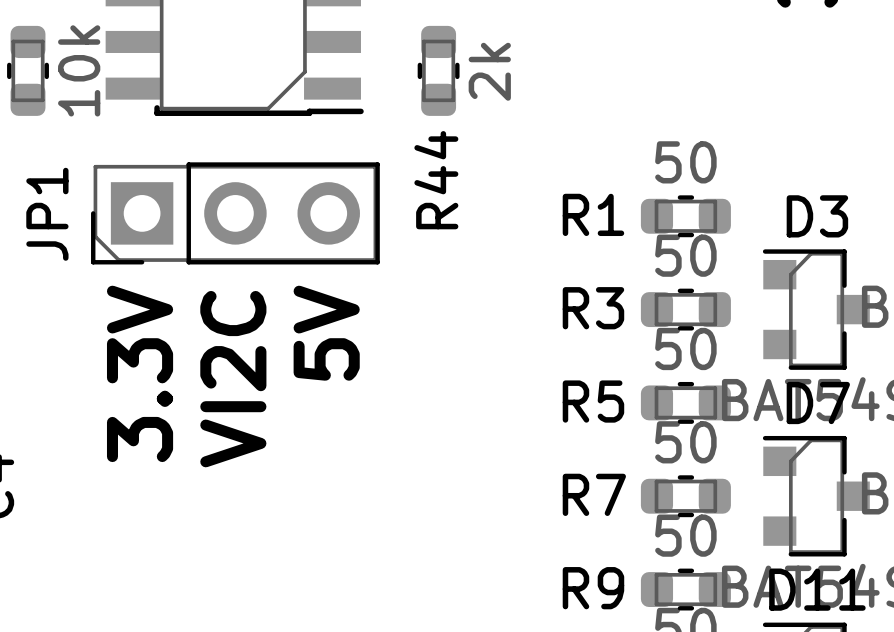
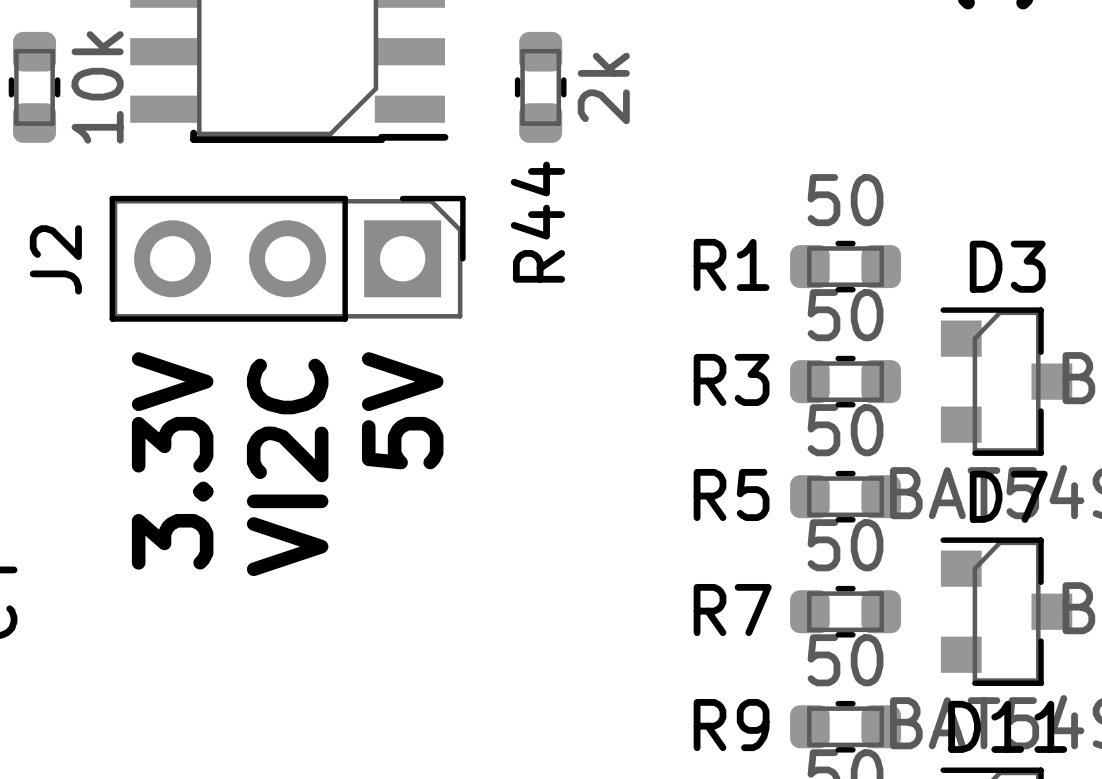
J2: none -> (287, 258)
JP1: (235, 213) -> none

